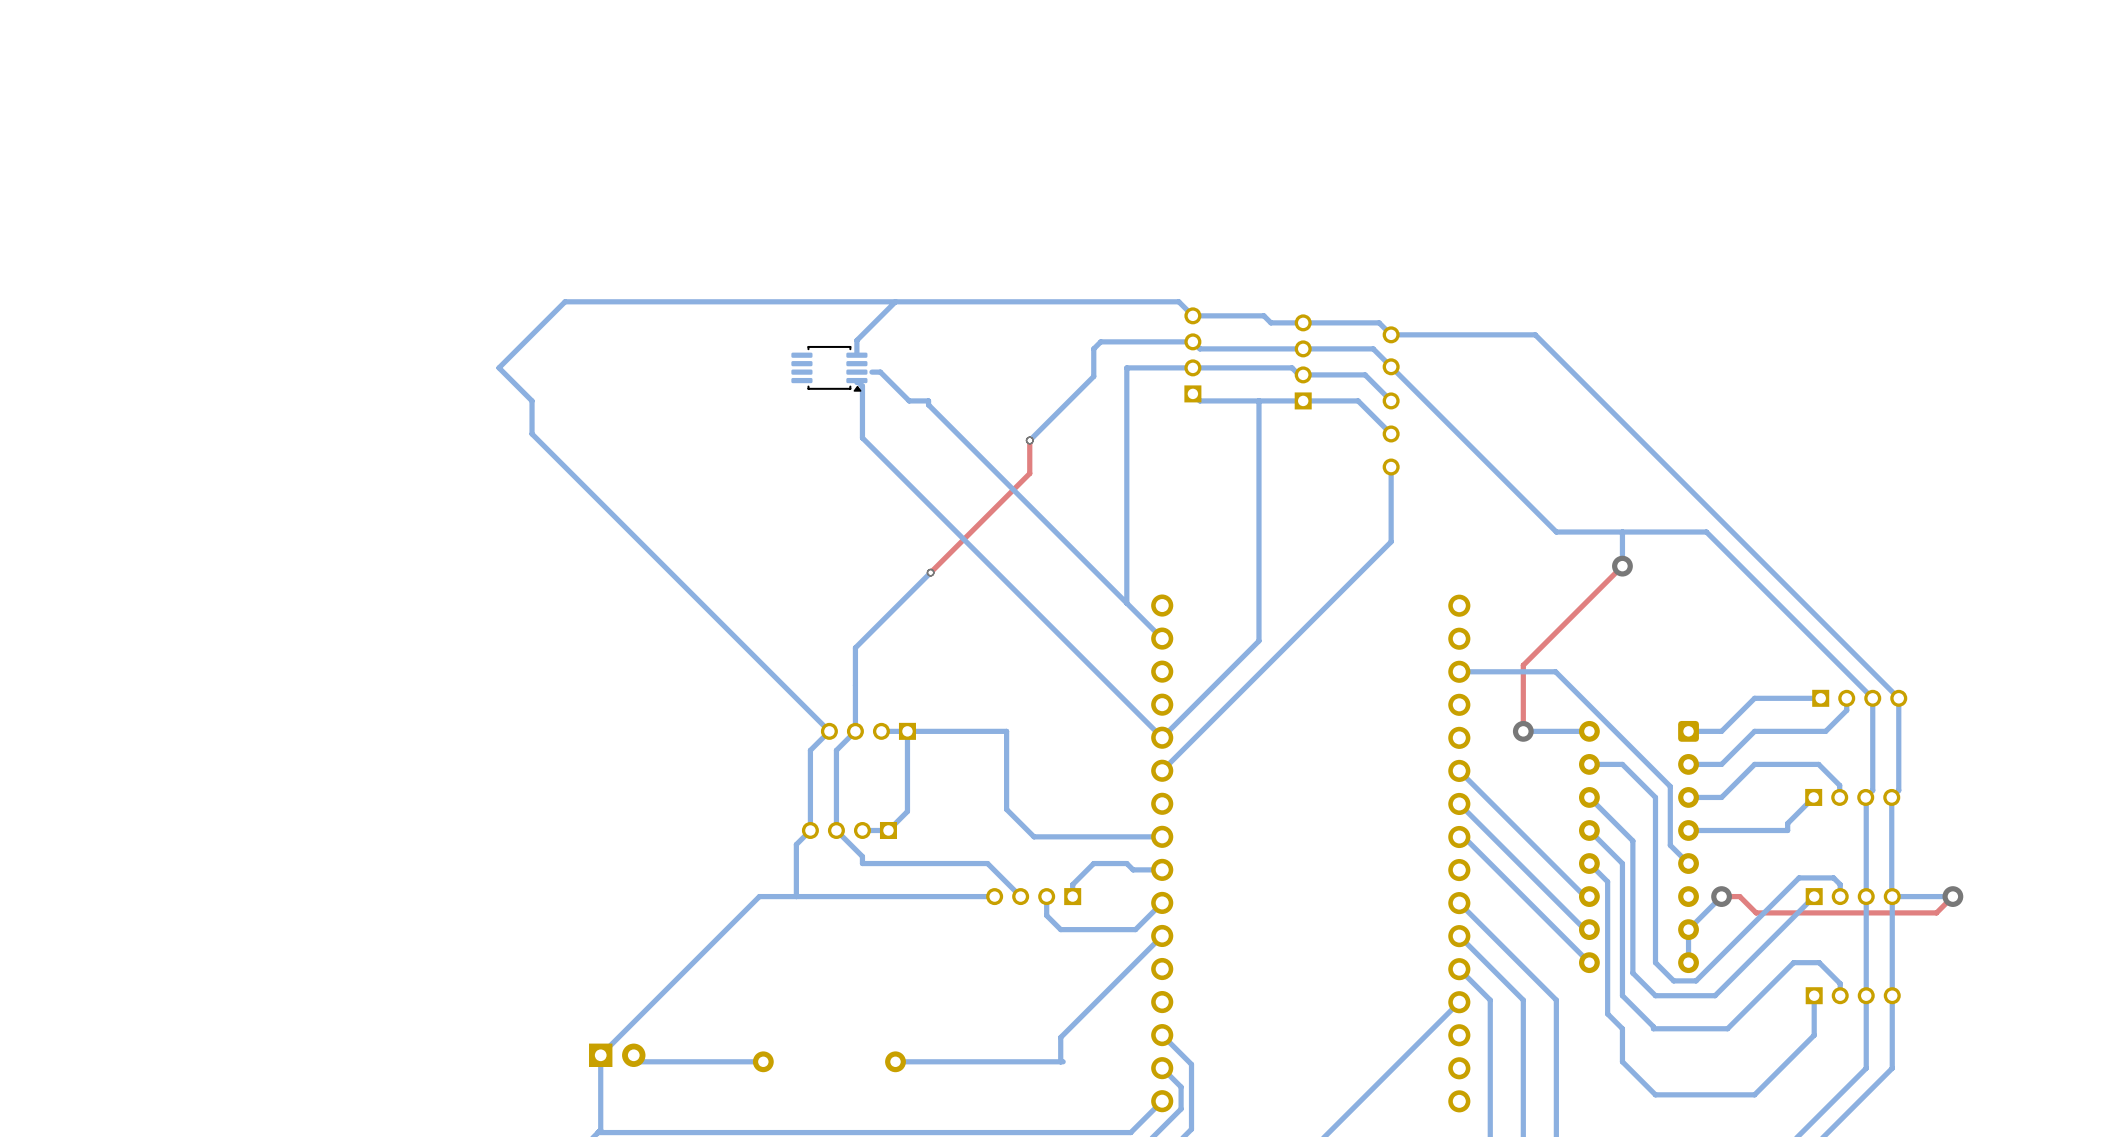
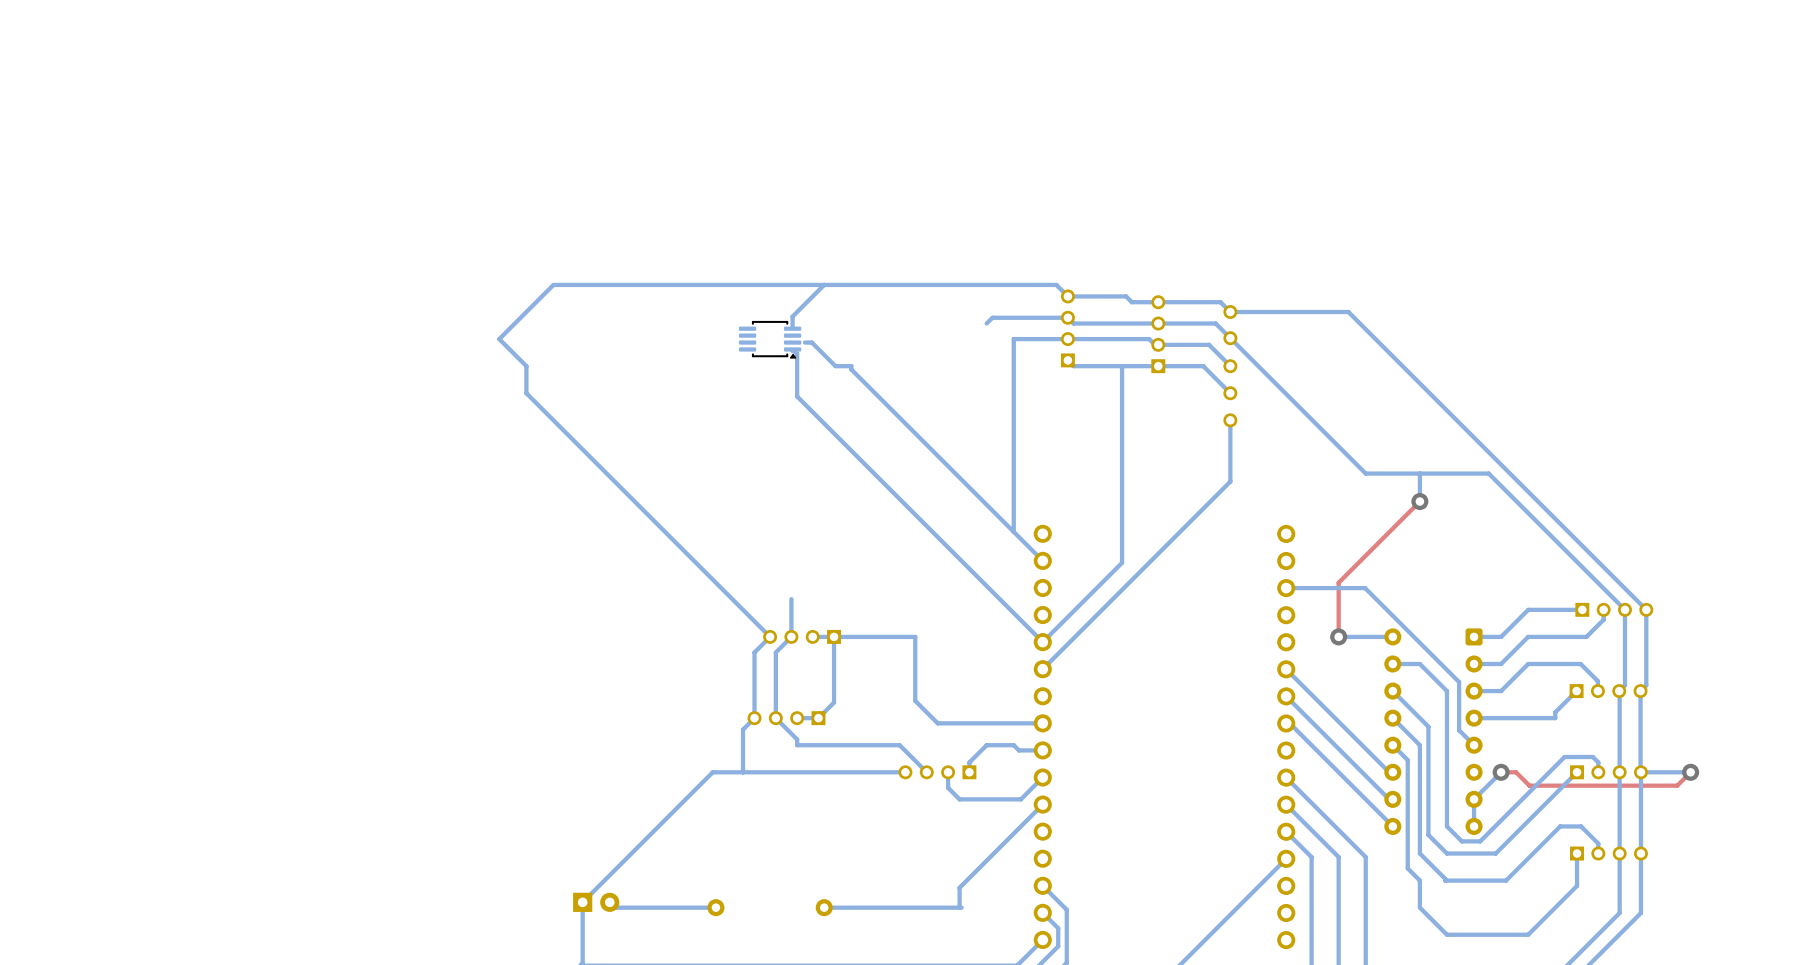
bottom track: (1093, 348) (1093, 376) (1029, 440) -> none
top track: (1029, 440) (1029, 473) (930, 572) -> none
via: (1029, 440) -> none
bottom track: (930, 572) (855, 647) (855, 685) -> none
via: (930, 572) -> none

